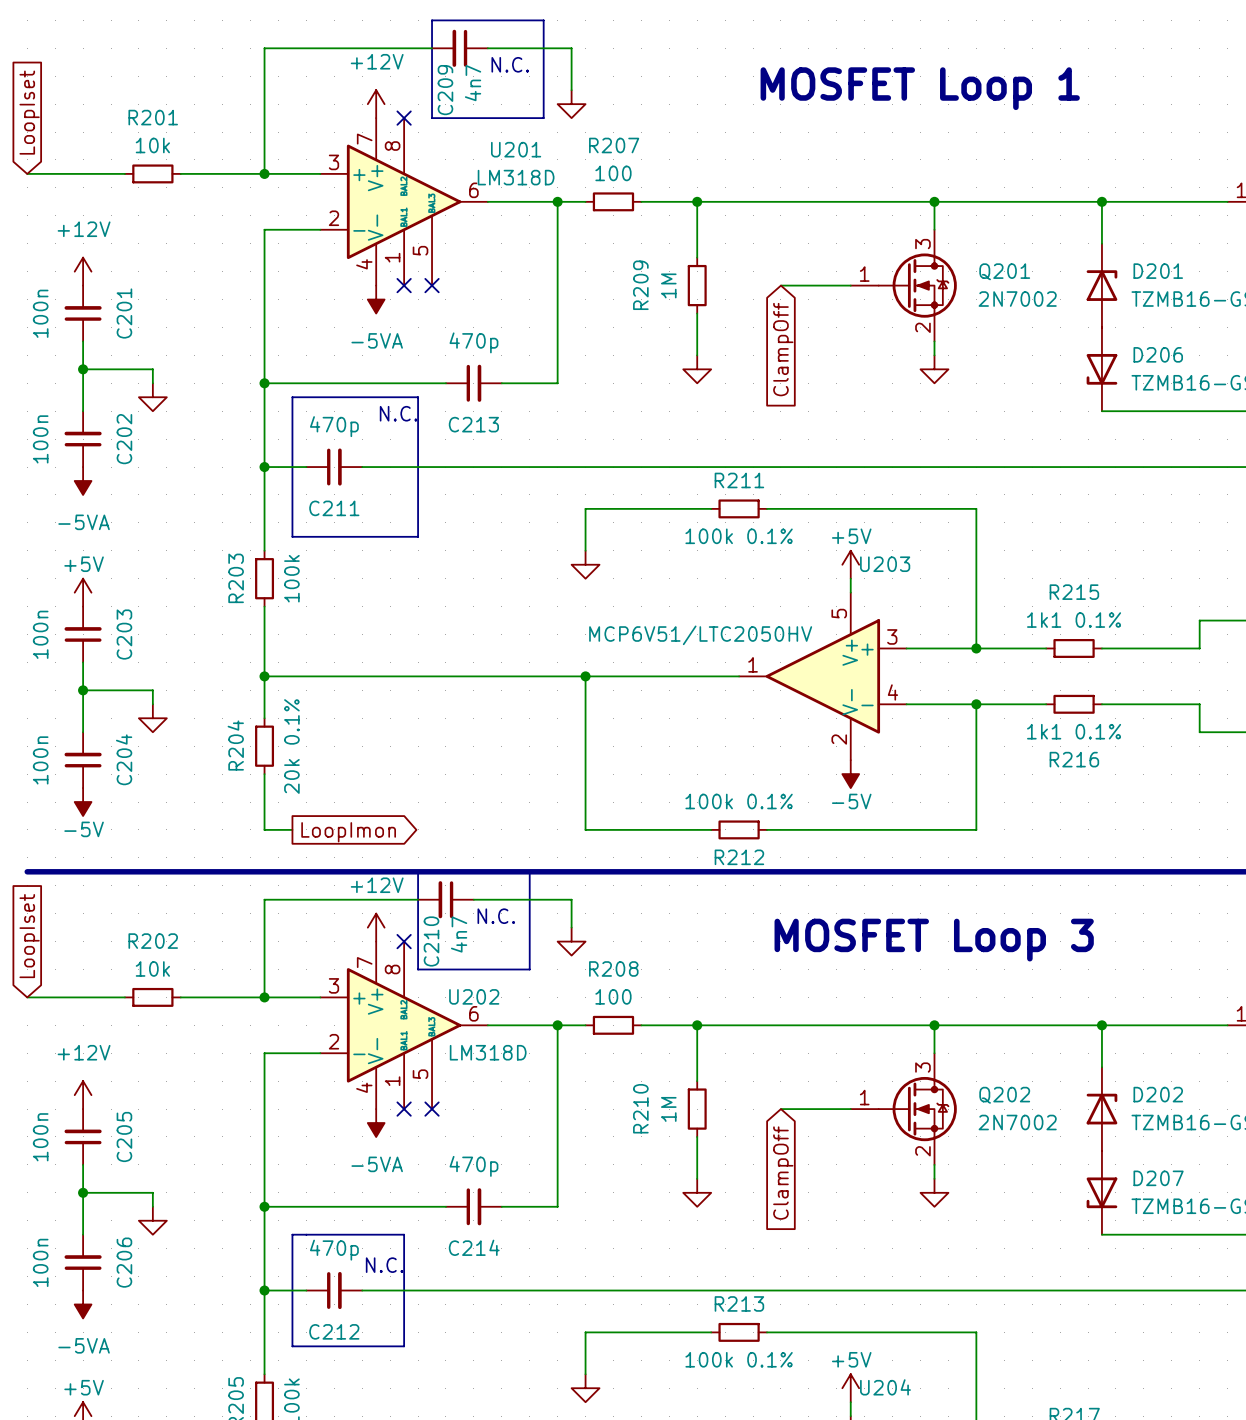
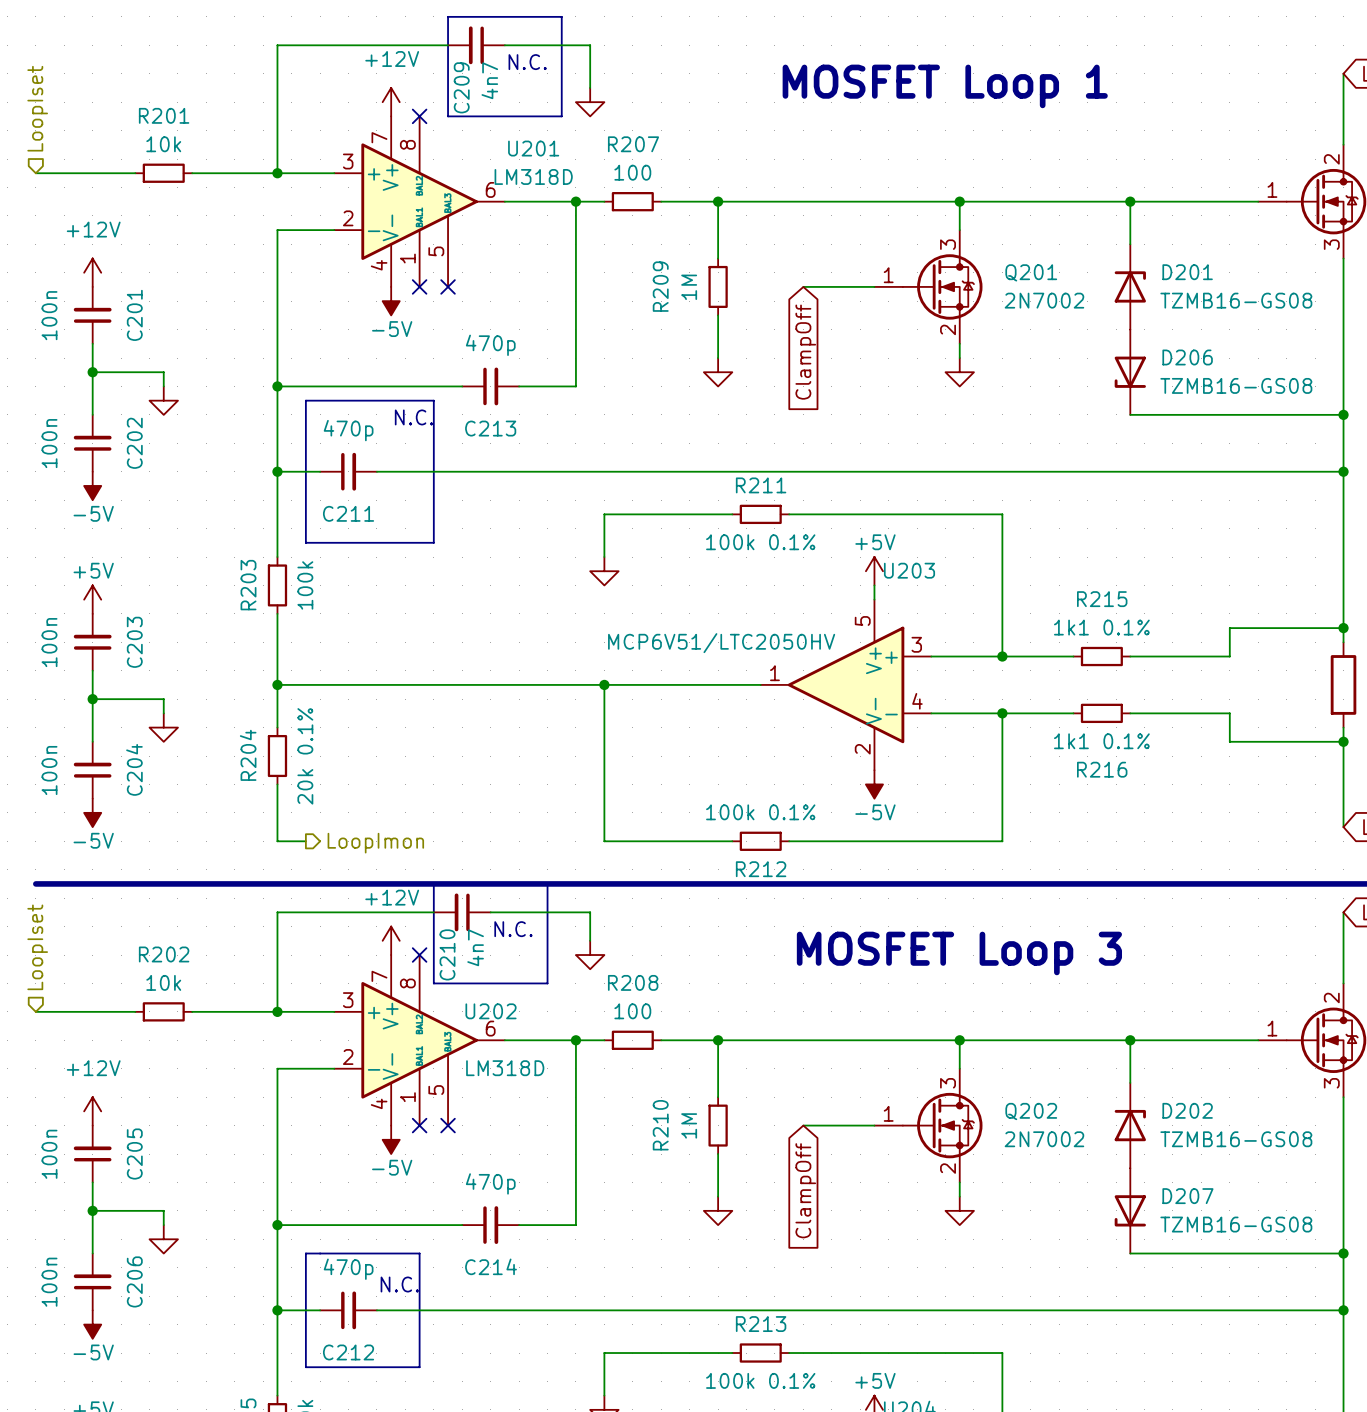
hierarchical label: none -> LoopIset (37, 108)
global label: LoopIset (29, 112) -> none
power symbol: -5VA (376, 299) -> -5V (391, 301)
power symbol: -5VA (83, 480) -> -5V (92, 485)
hierarchical label: none -> LoopImon (375, 843)
global label: LoopImon (348, 832) -> none
hierarchical label: none -> LoopIset (37, 947)
global label: LoopIset (29, 936) -> none
power symbol: -5VA (376, 1123) -> -5V (391, 1139)
power symbol: -5VA (83, 1304) -> -5V (92, 1324)

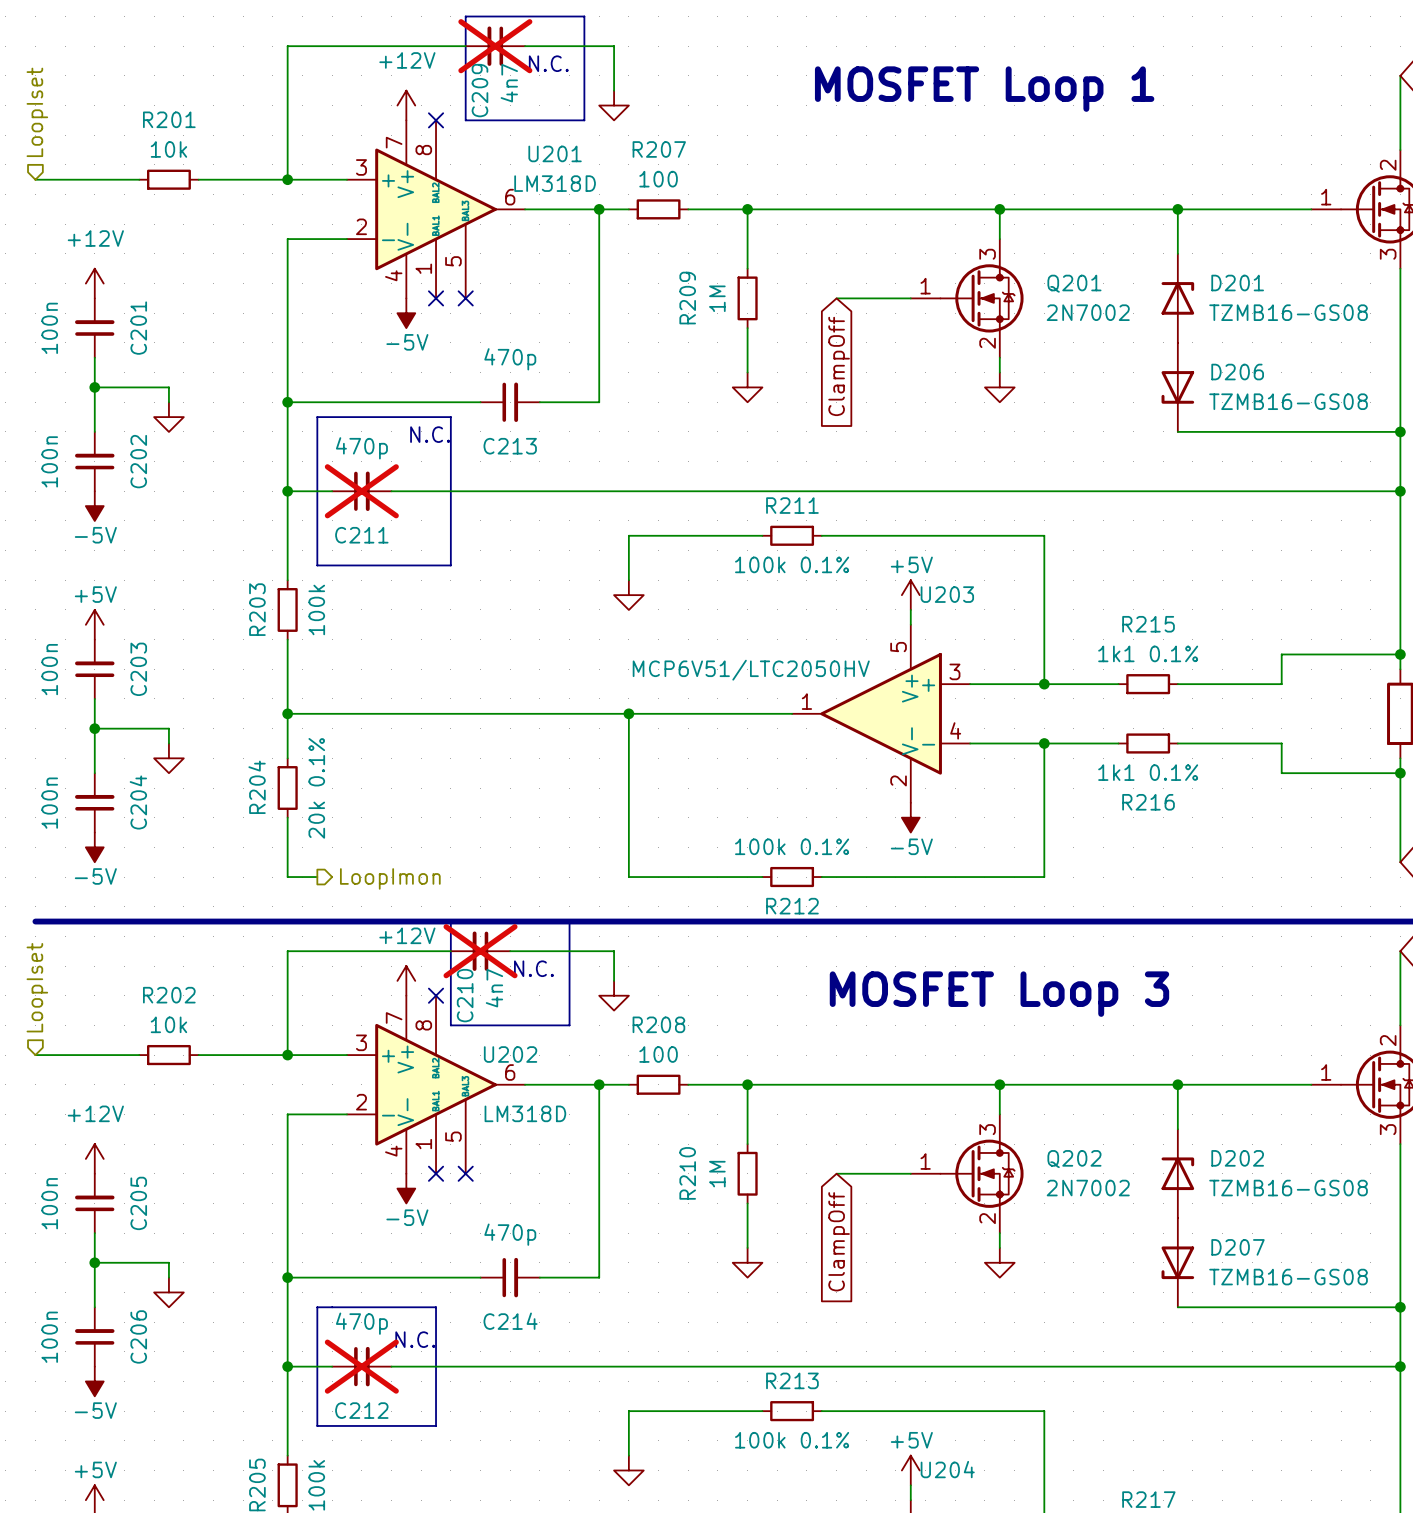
C209 do-not-place cross: none -> (495, 46)
C211 do-not-place cross: none -> (361, 491)
C210 do-not-place cross: none -> (480, 951)
C212 do-not-place cross: none -> (361, 1366)

